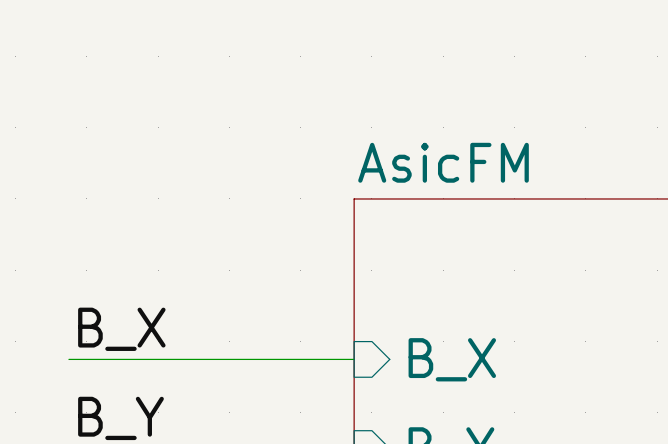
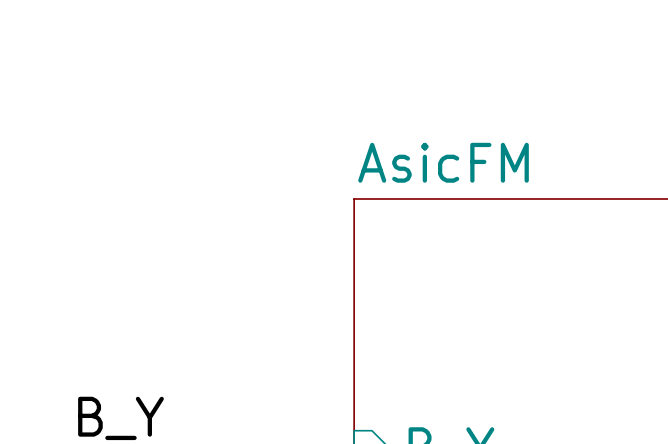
label: B_X (121, 329) -> none
wire: (68, 359) (354, 359) -> none
sheet pin: B_X (452, 359) -> none

